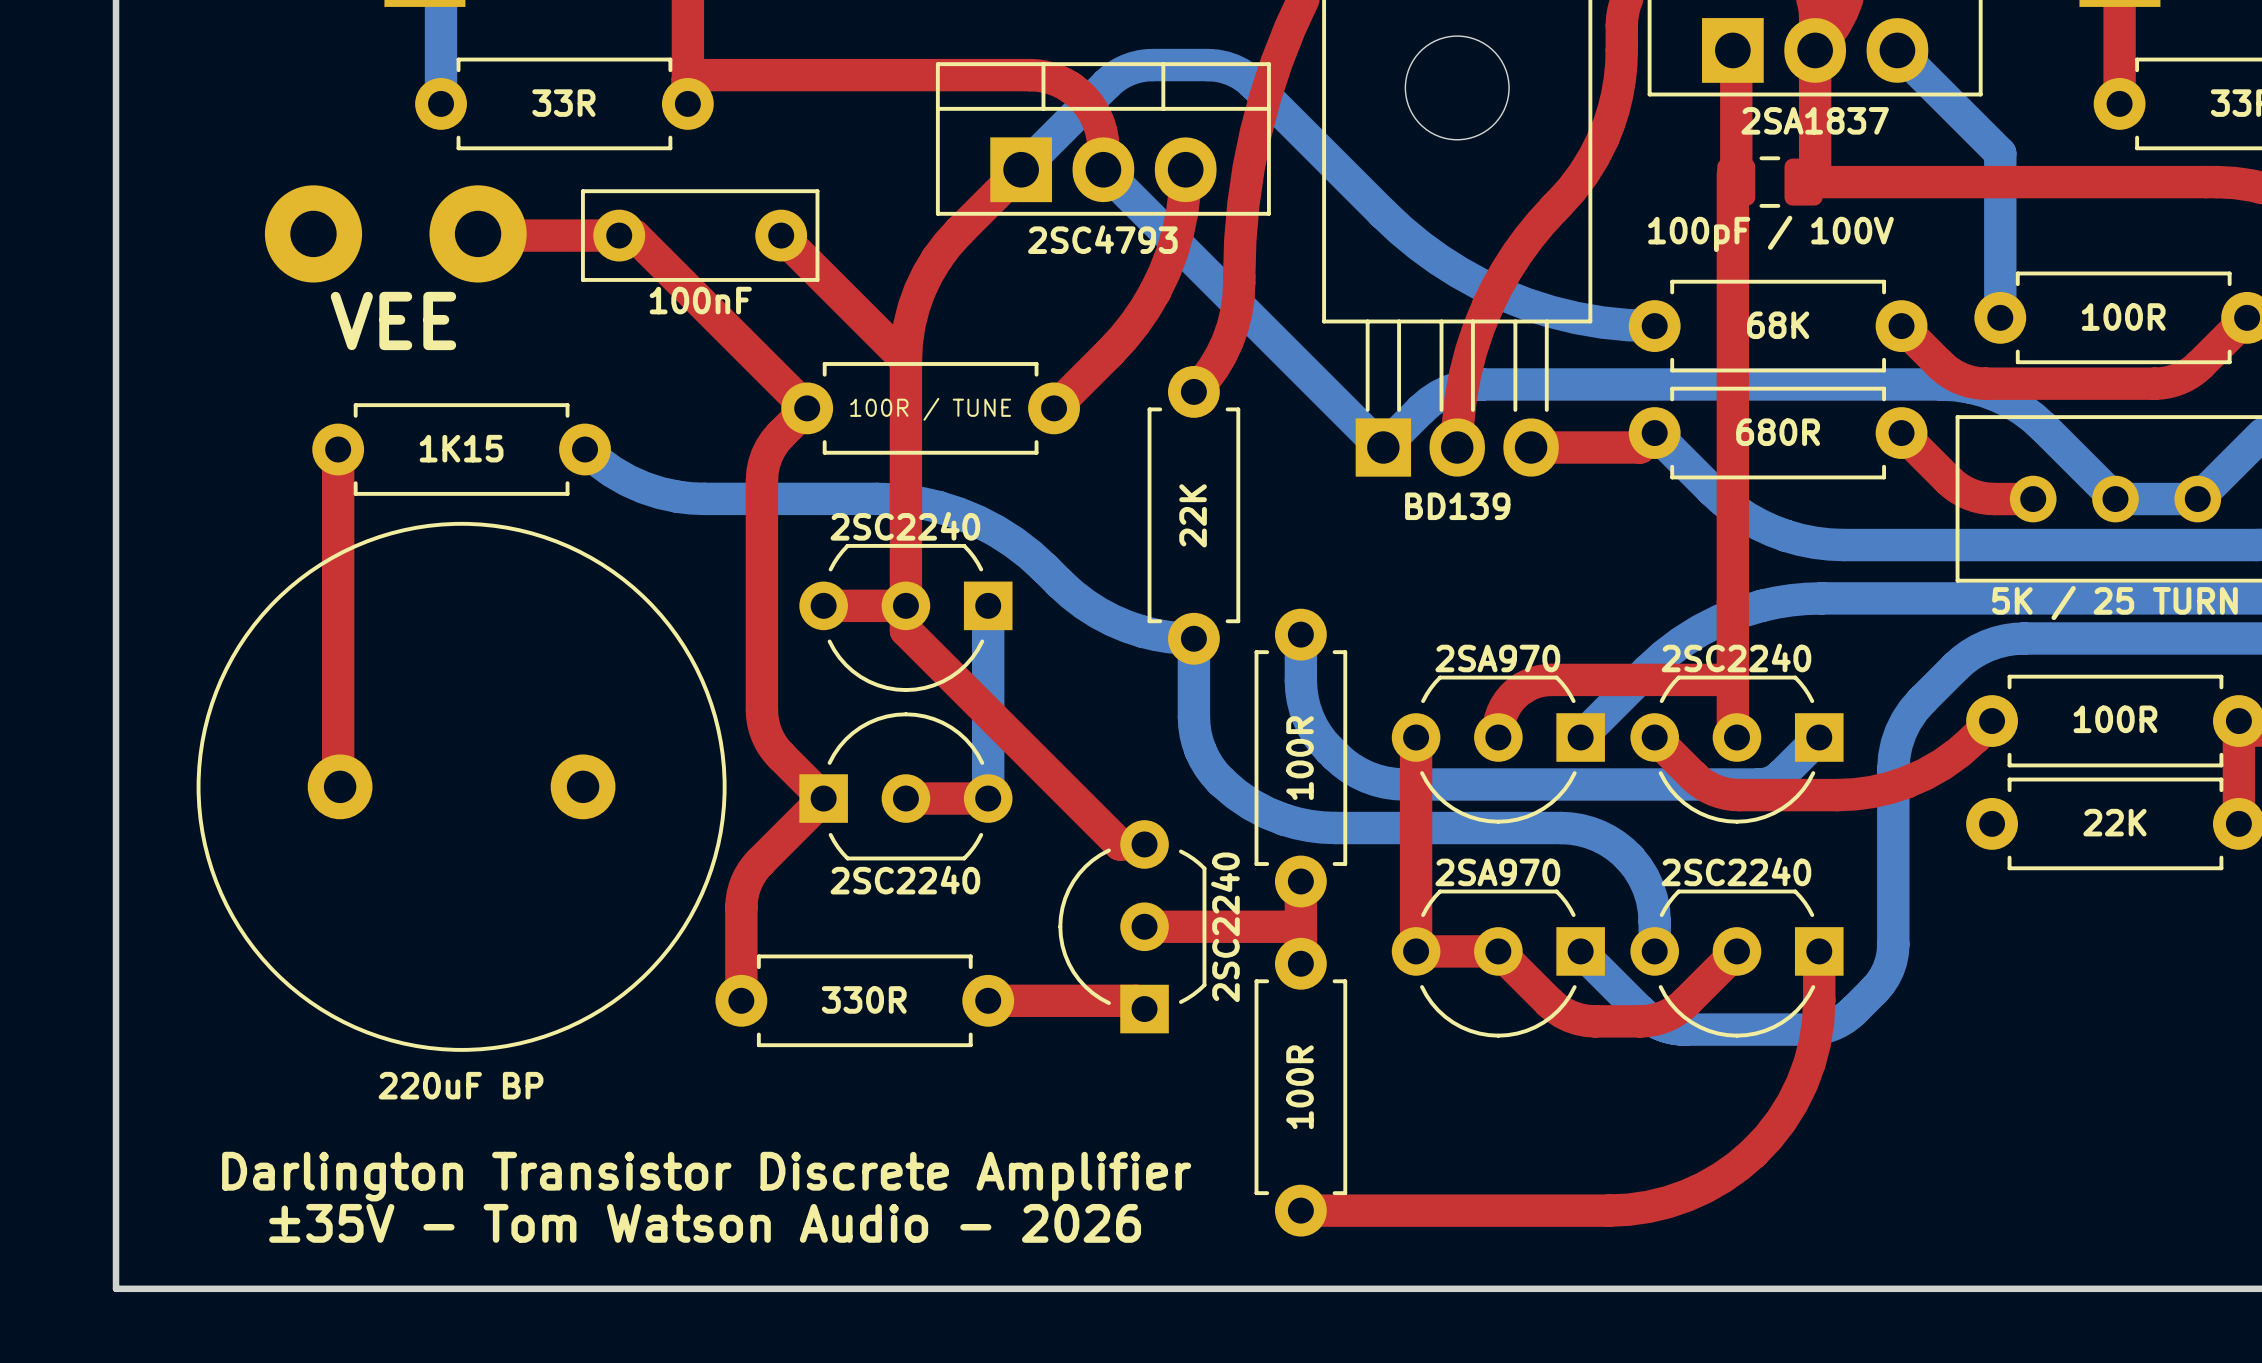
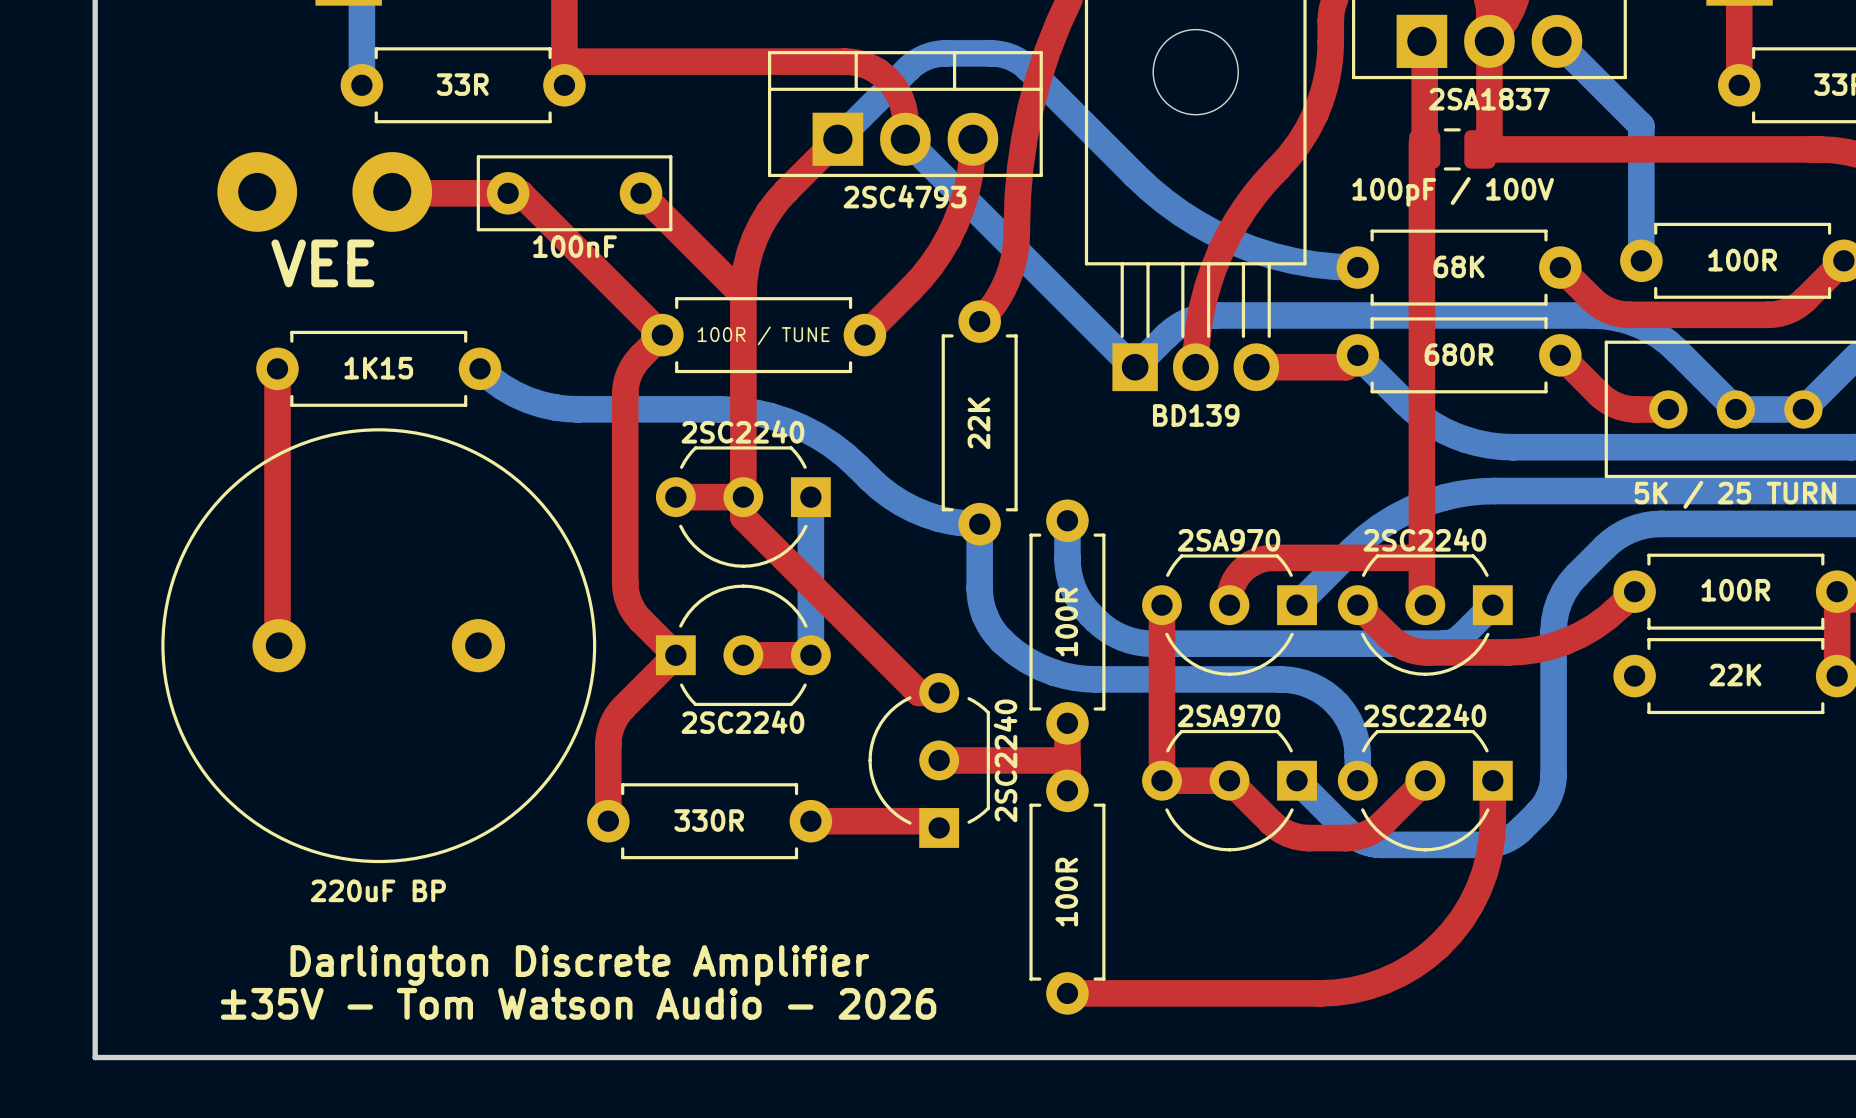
text: Darlington Transistor Discrete Amplifier (706, 1176) -> Darlington Discrete Amplifier (579, 965)

